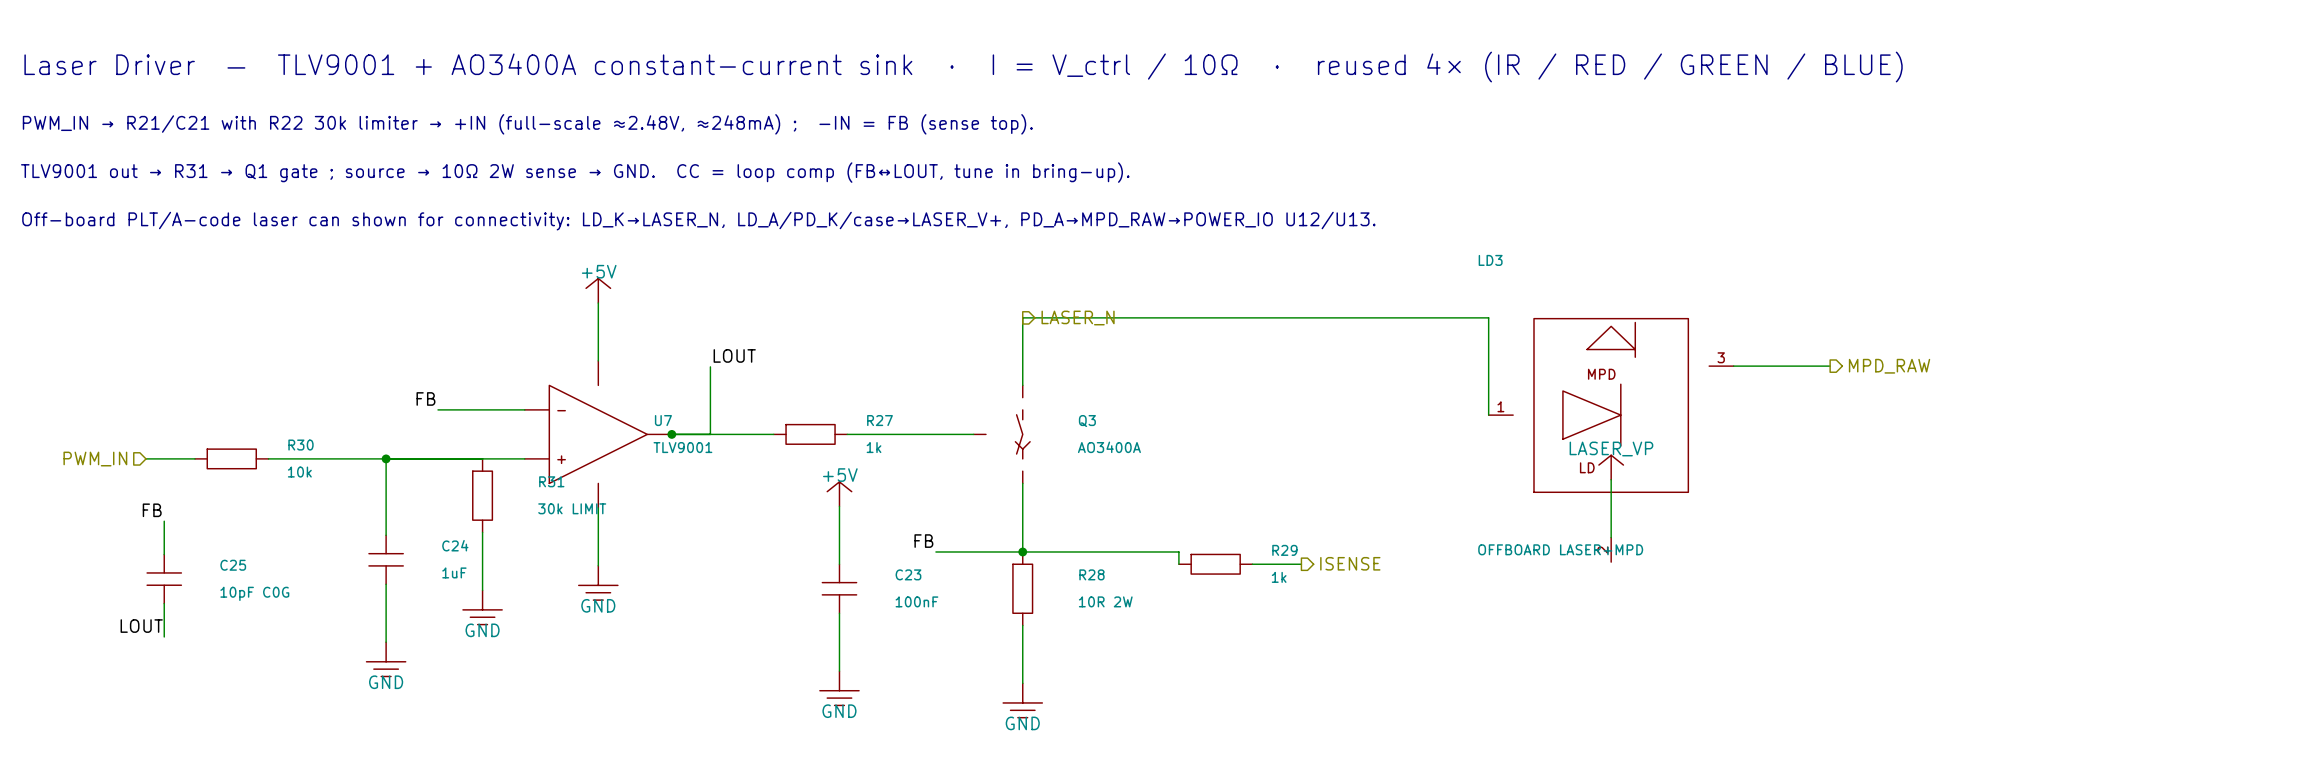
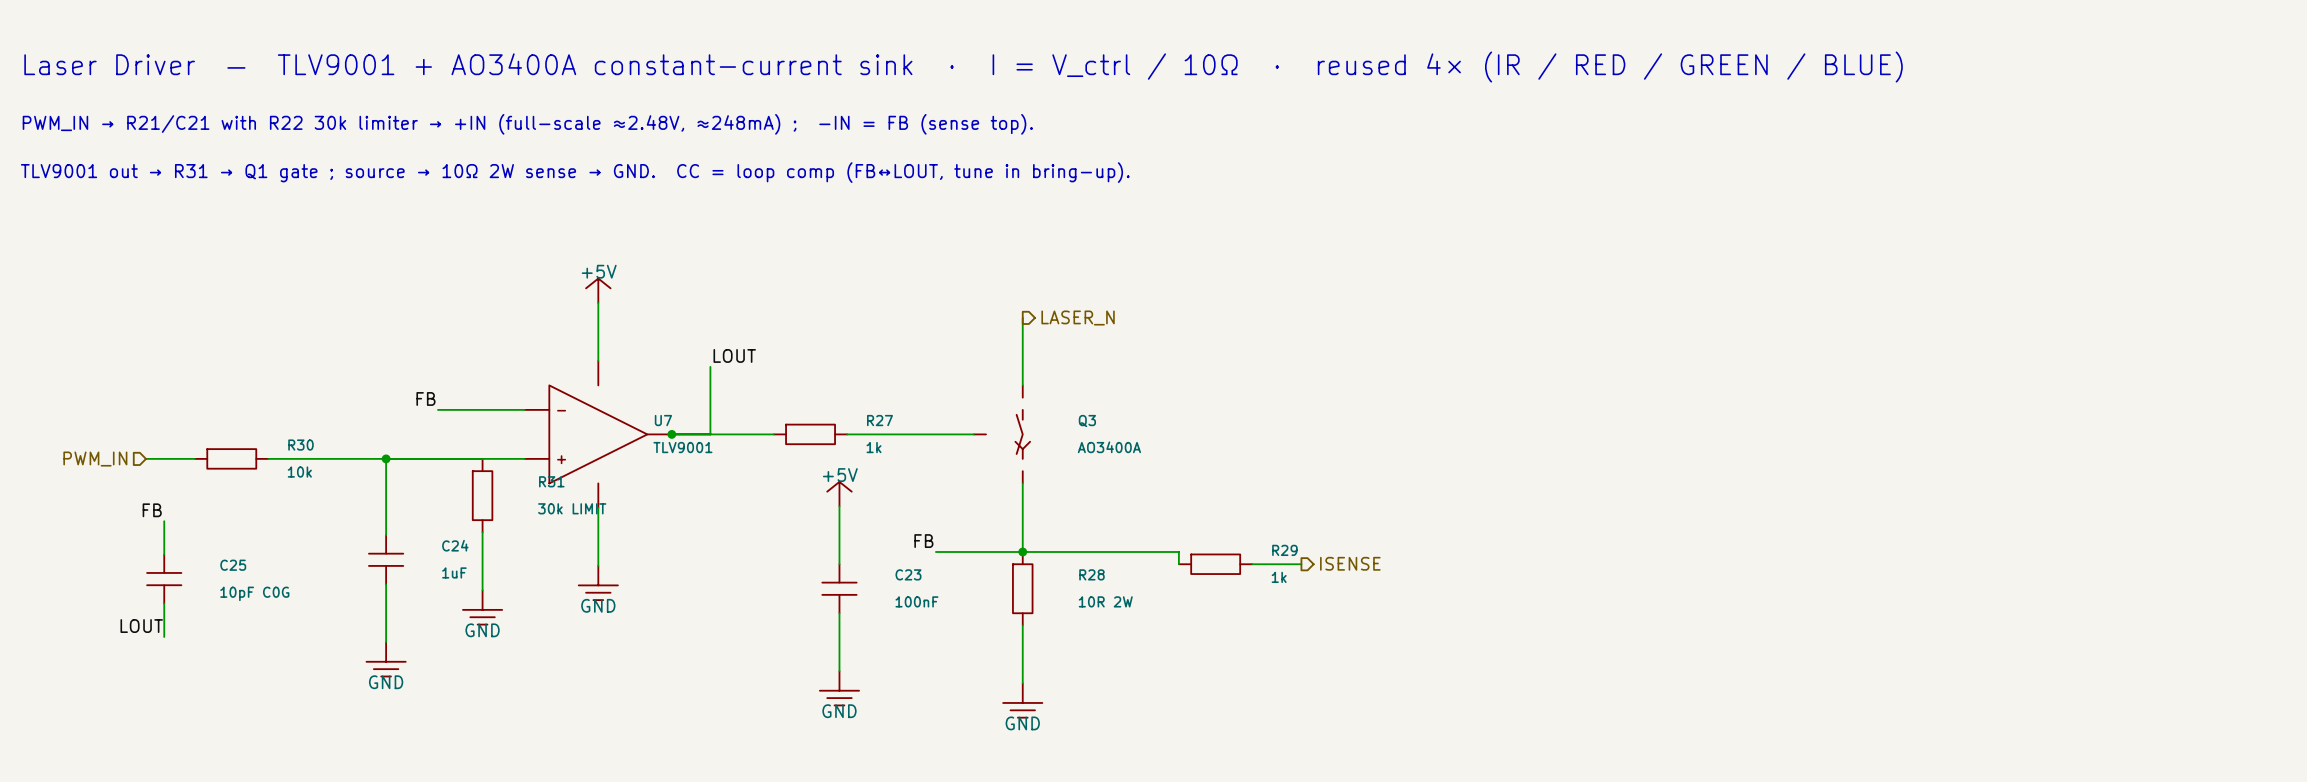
text: Off-board PLT/A-code laser can shown for connectivity: LD_K→LASER_N, LD_A/PD_K/case→LASER_V+, PD_A→MPD_RAW→POWER_IO U12/U13. (698, 221) -> none
wire: (1022, 317) (1488, 317) (1488, 415) -> none
wire: (1733, 366) (1830, 366) -> none
hierarchical label: MPD_RAW (1889, 366) -> none
LD3: OFFBOARD LASER+MPD (1611, 440) -> none
power symbol: LASER_VP (1611, 467) -> none
wire: (1611, 479) (1611, 537) -> none

